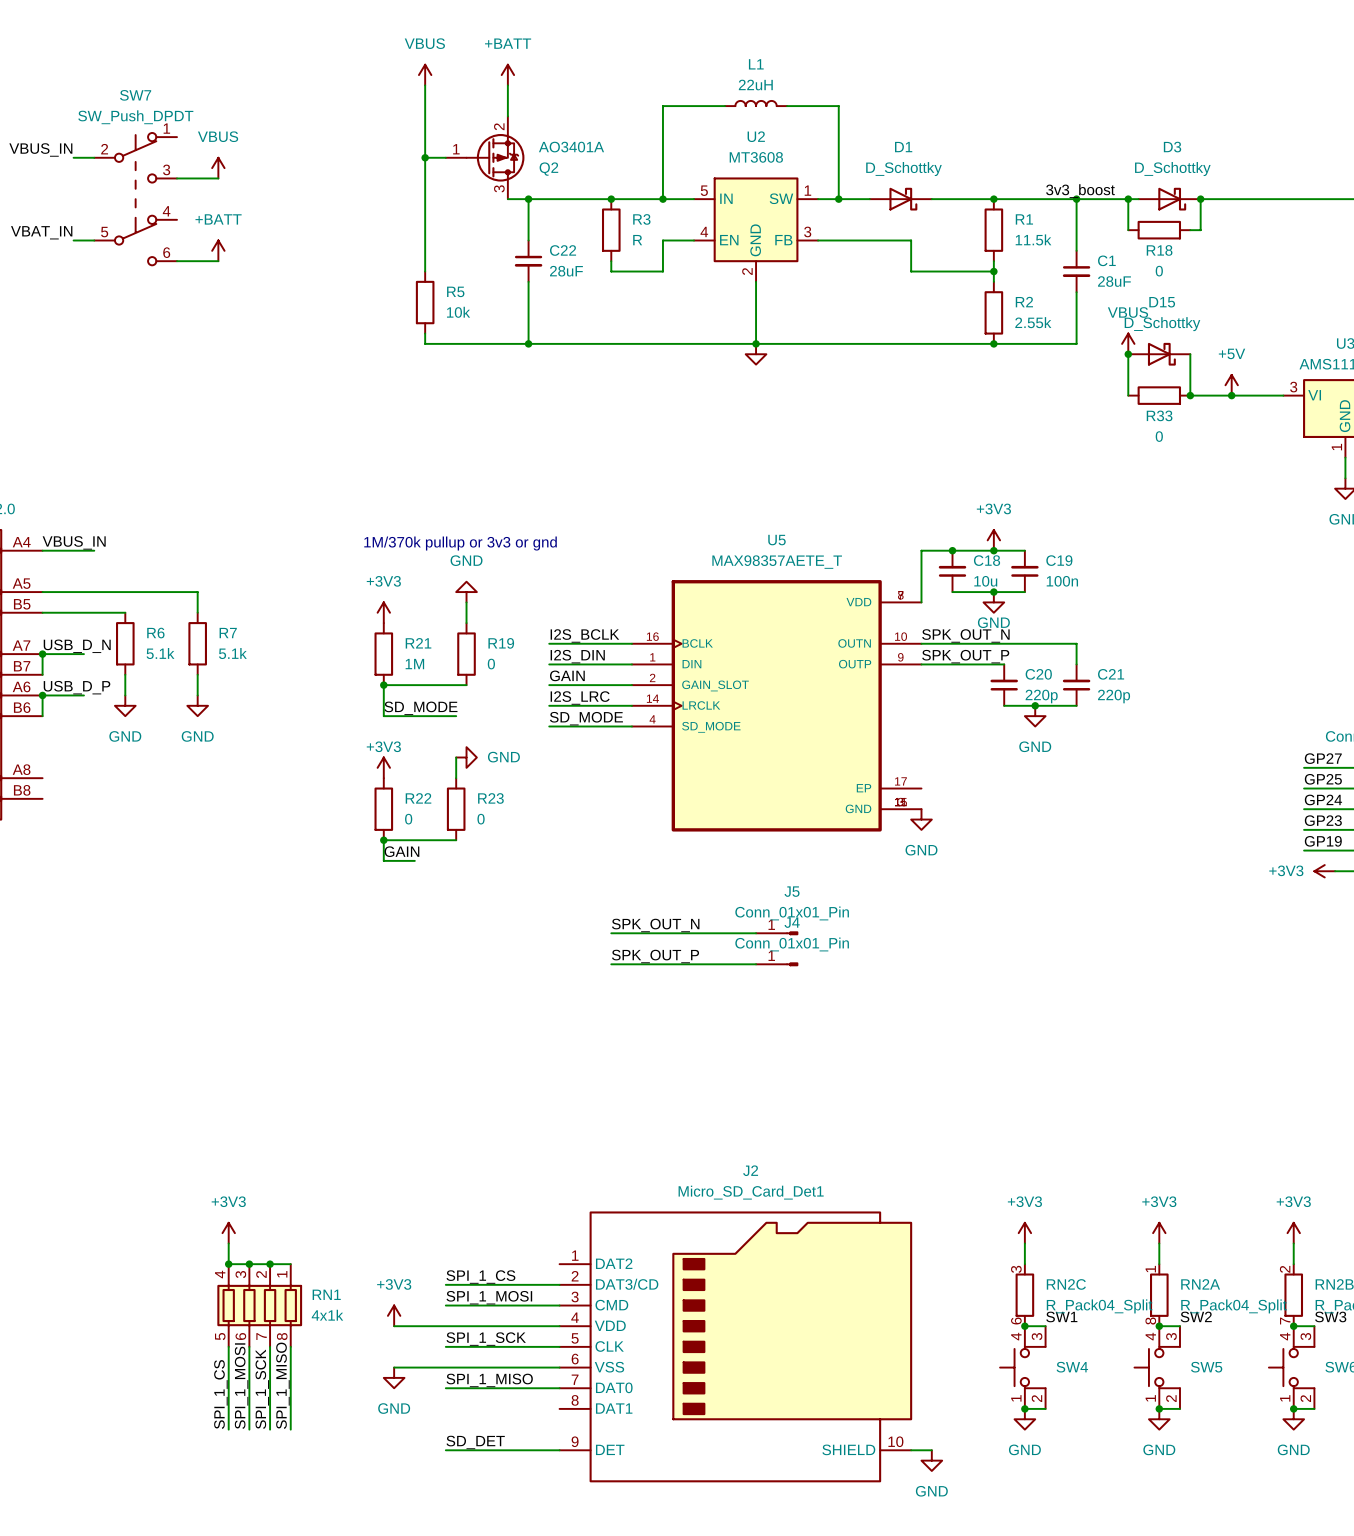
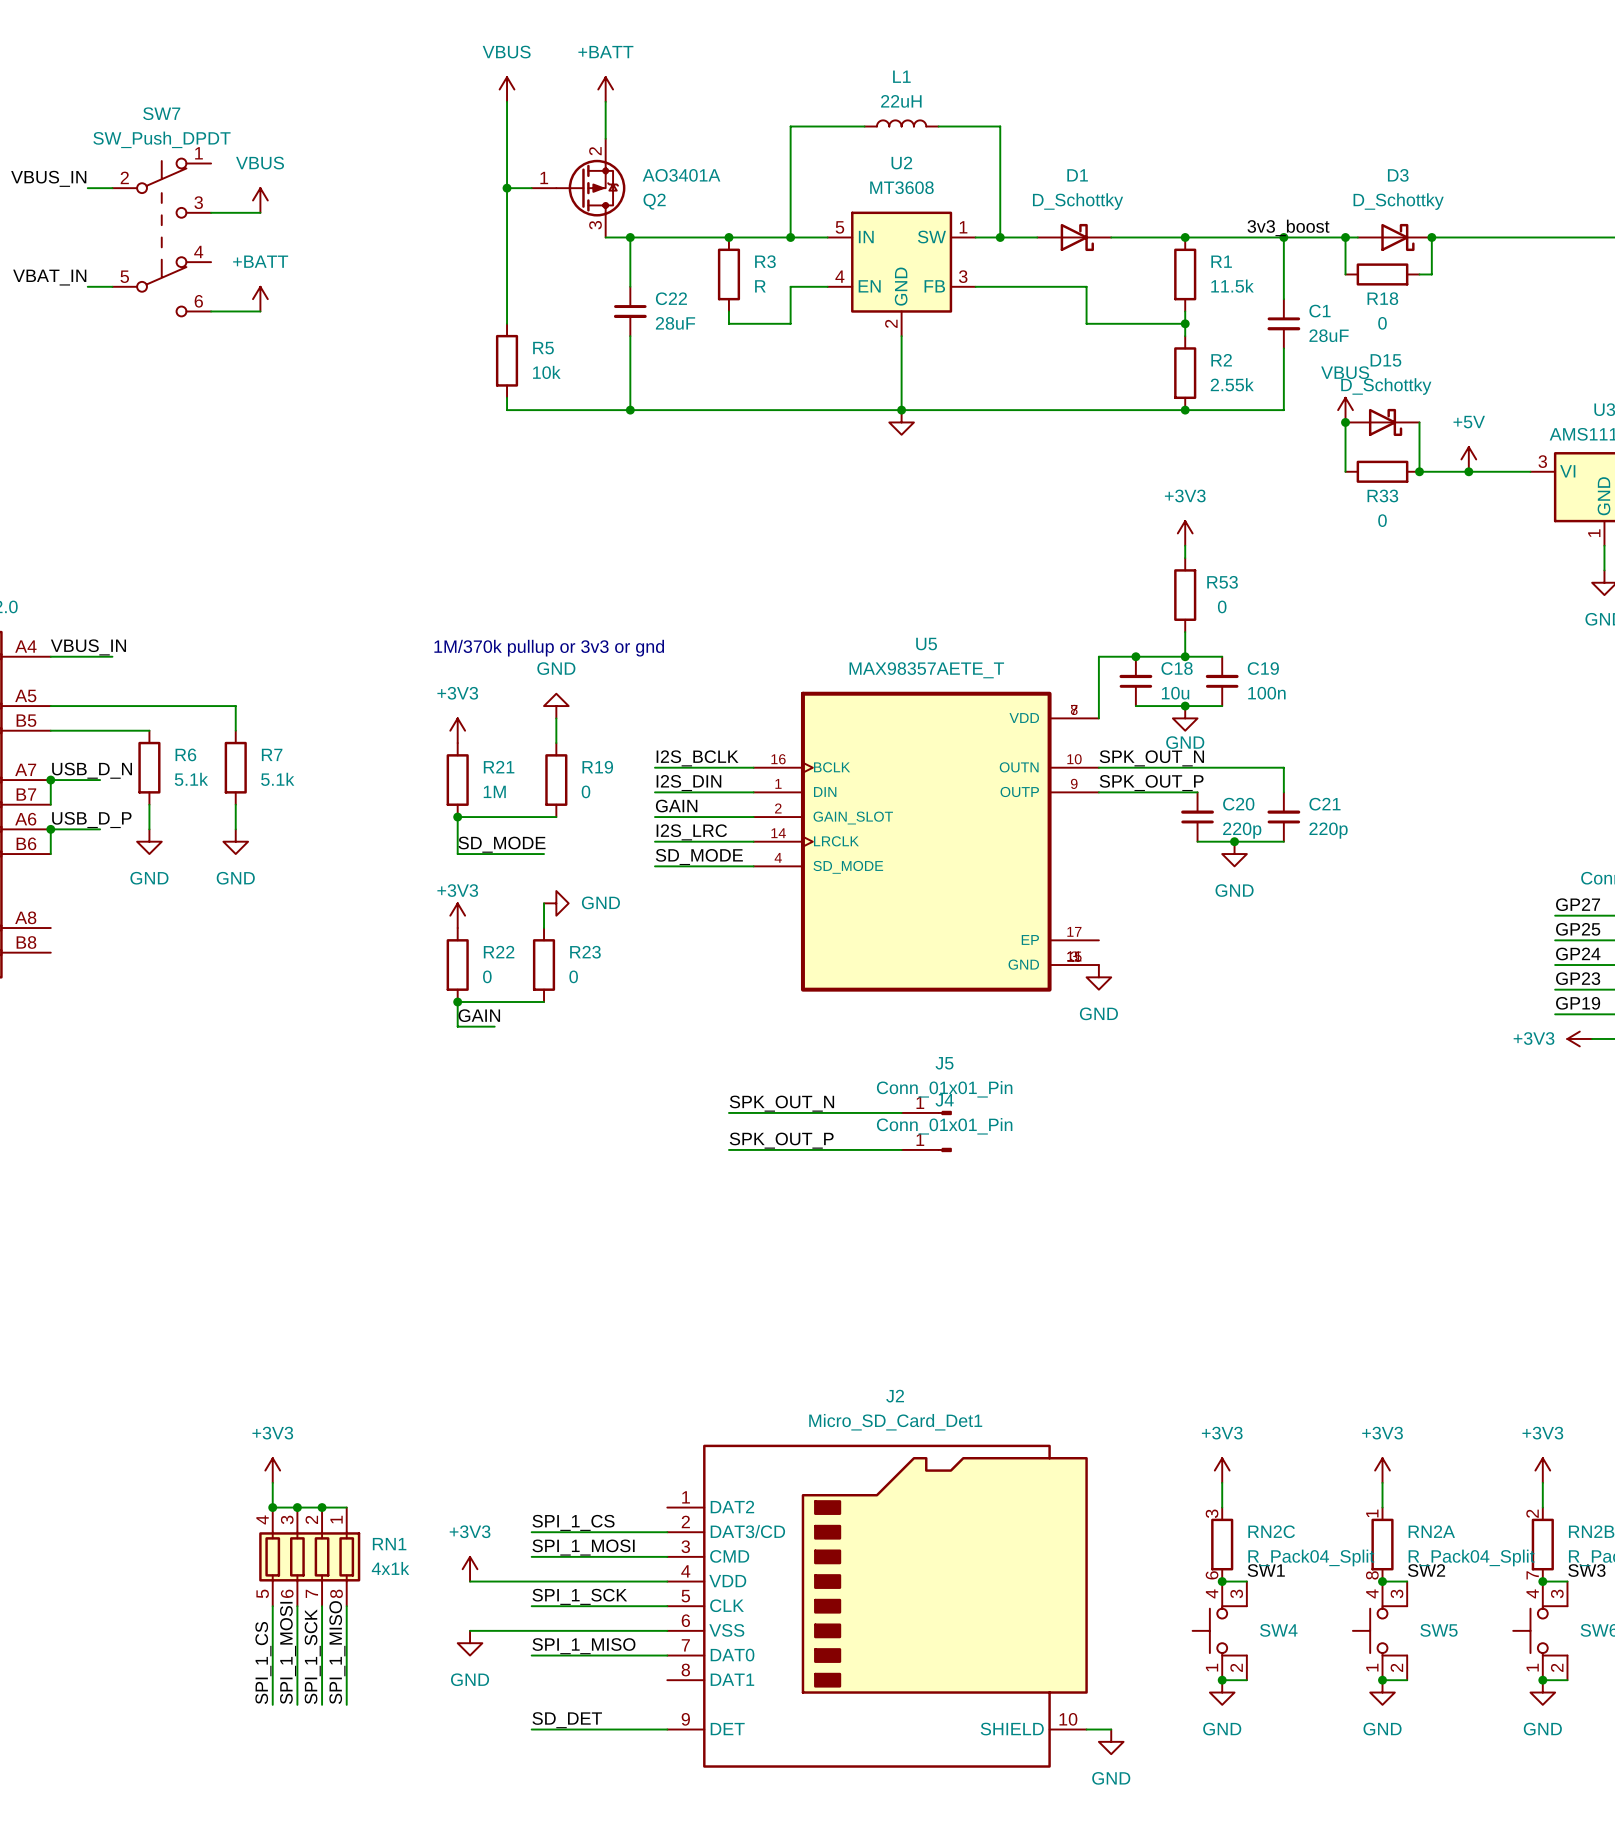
wire: none -> (1185, 545) (1185, 558)
R53: none -> 0 (1185, 595)
power symbol position: +3V3 (993, 540) -> +3V3 (1185, 533)

